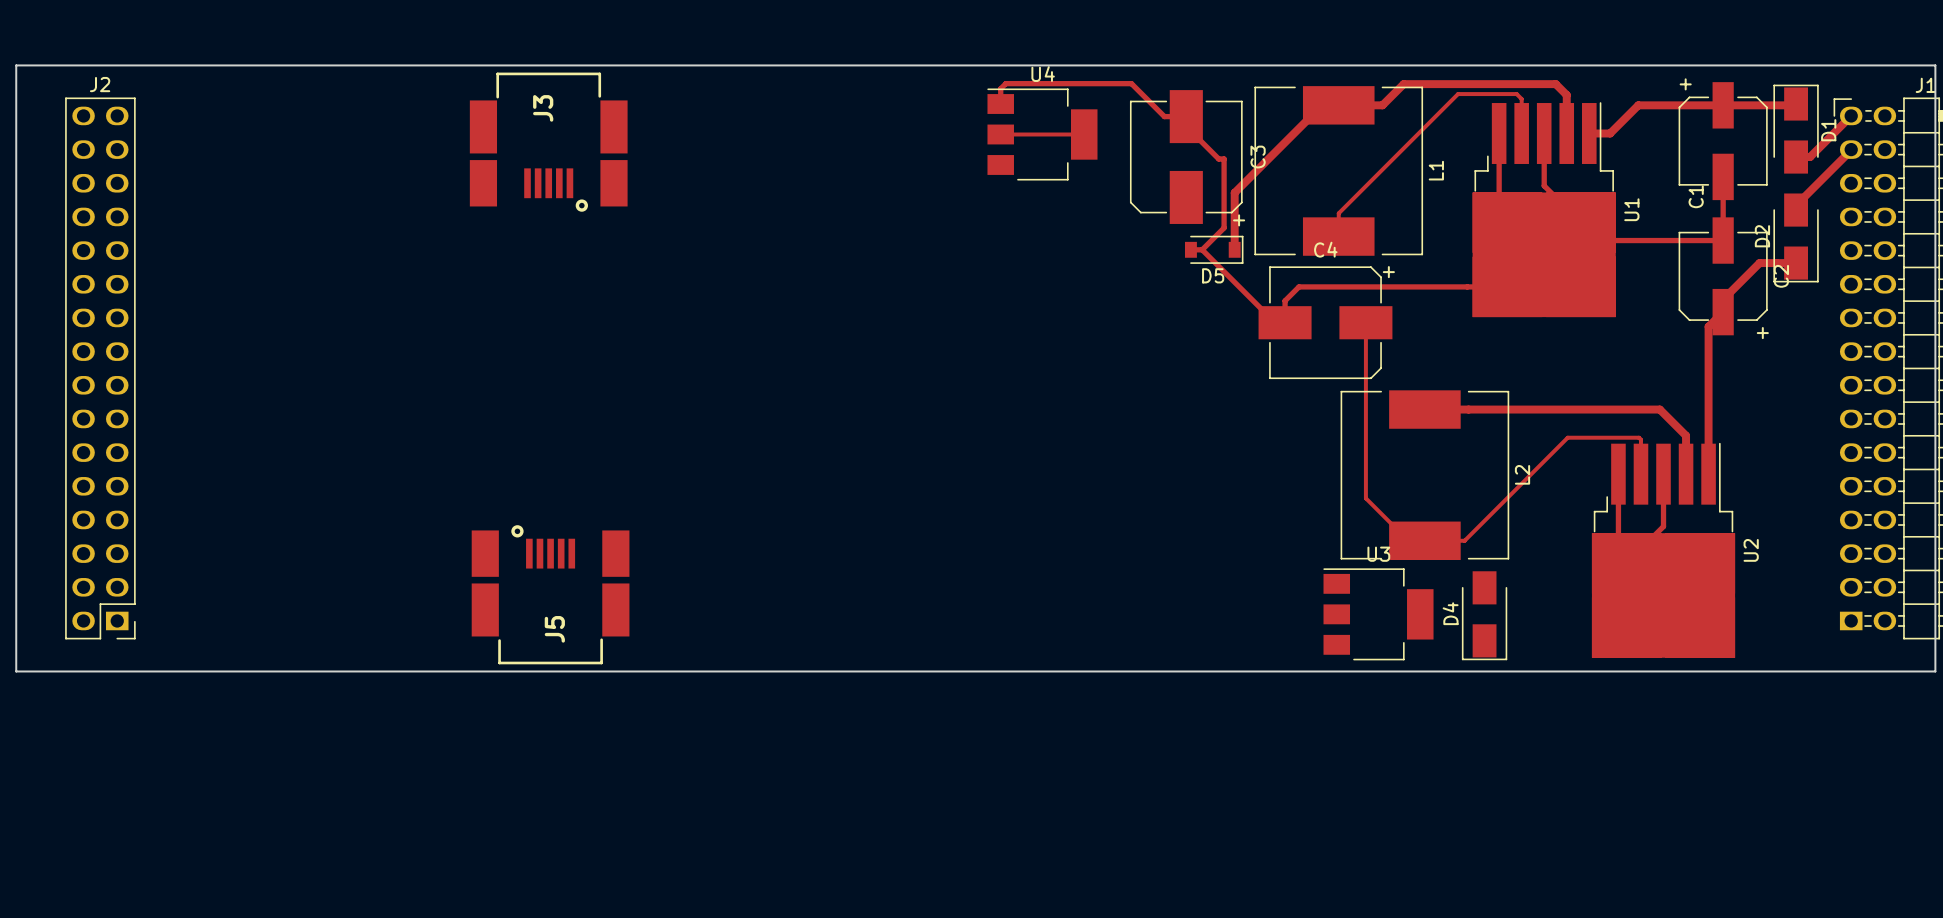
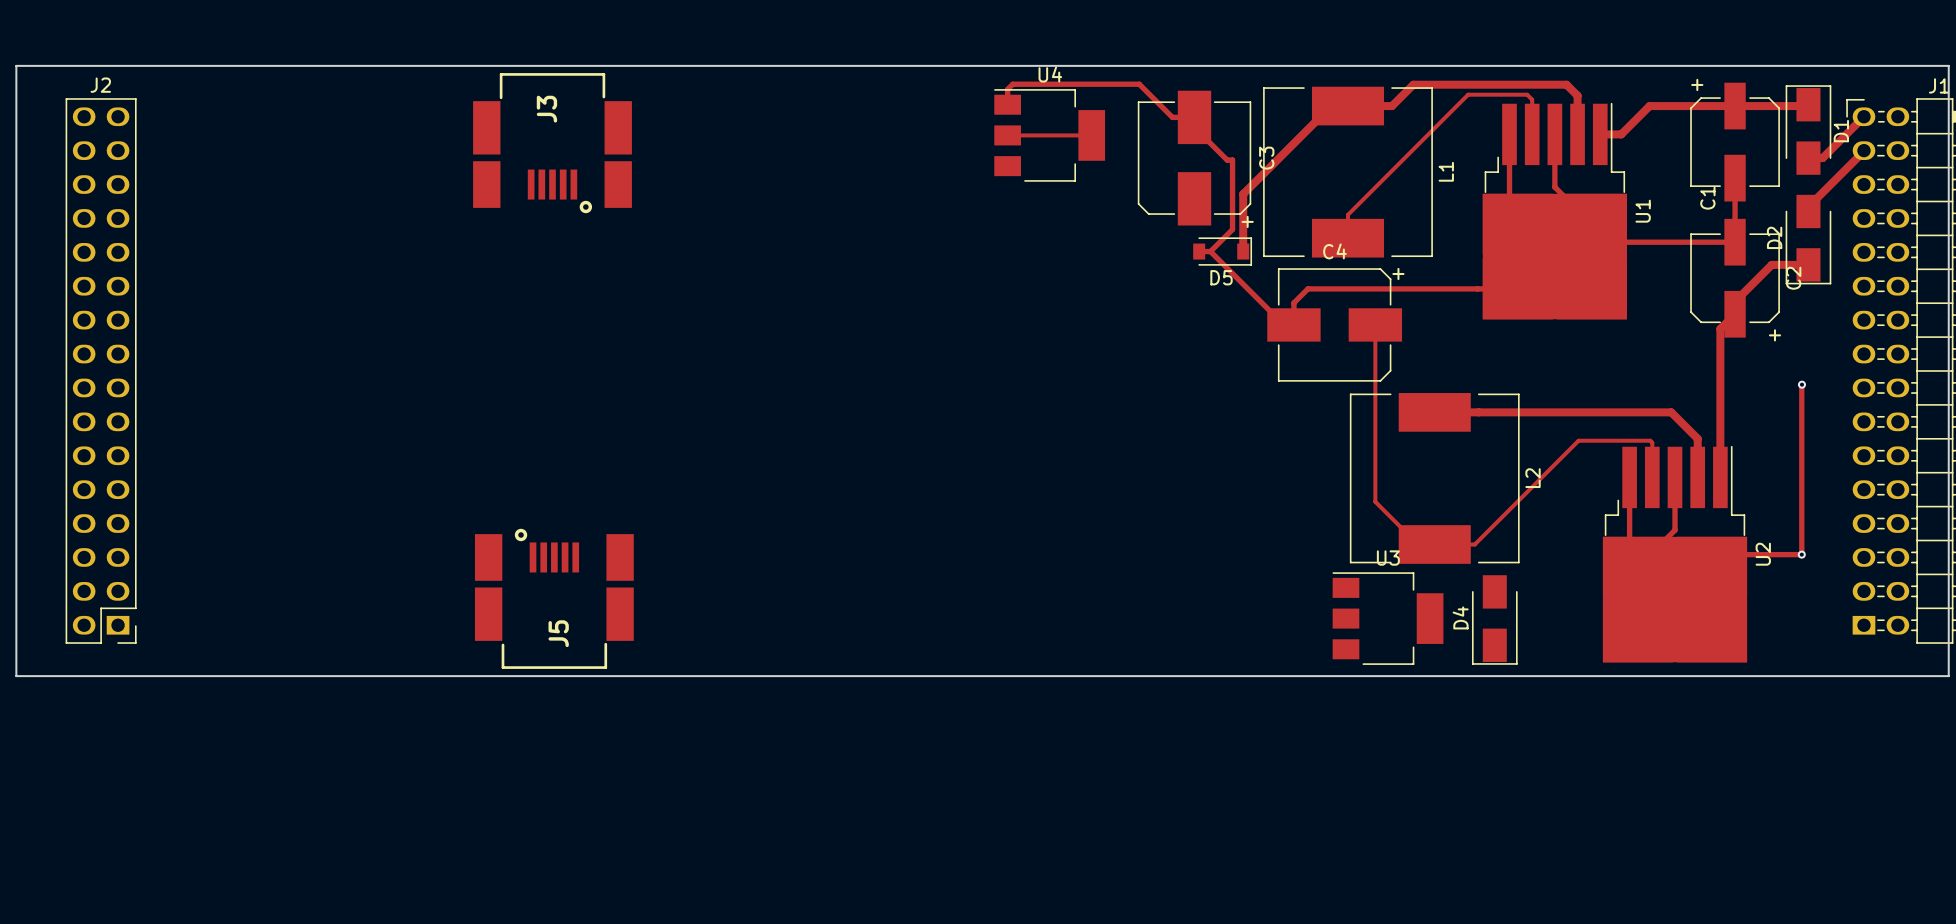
track: none -> (1801, 384) (1801, 554) (1724, 554) (1712, 567)
via: none -> (1801, 384)
via: none -> (1801, 554)

